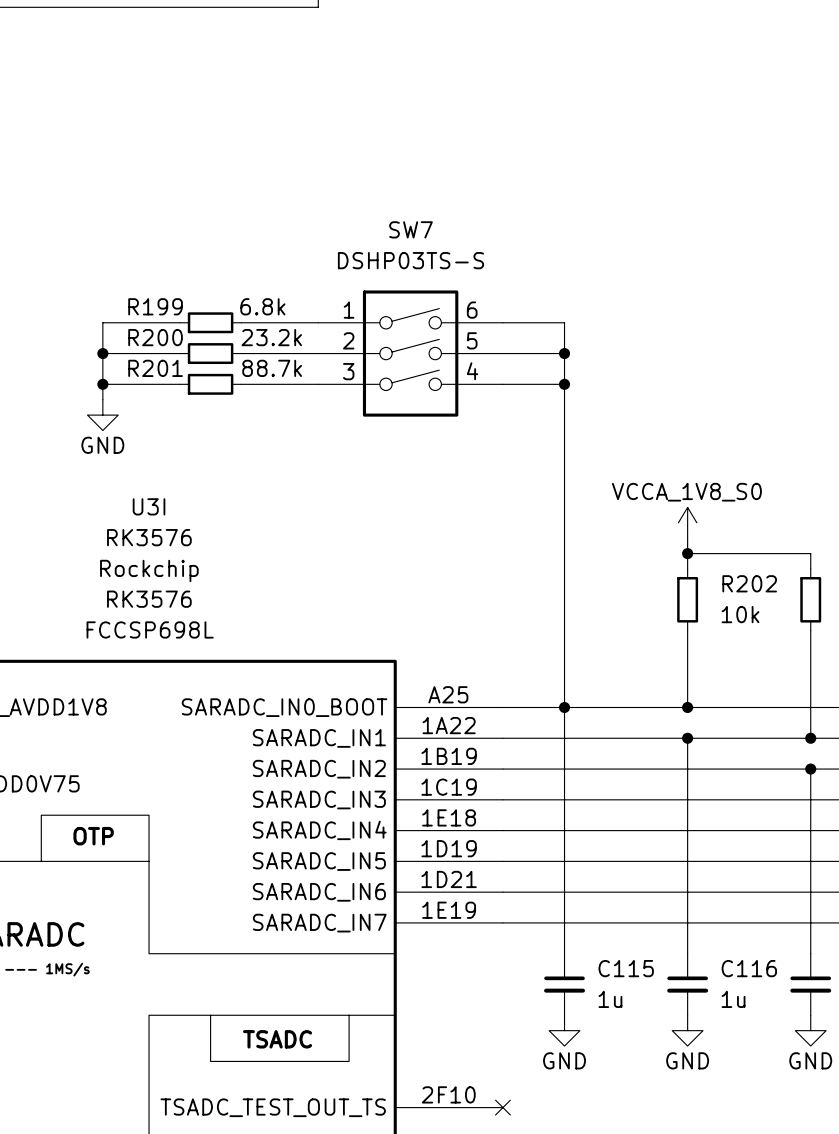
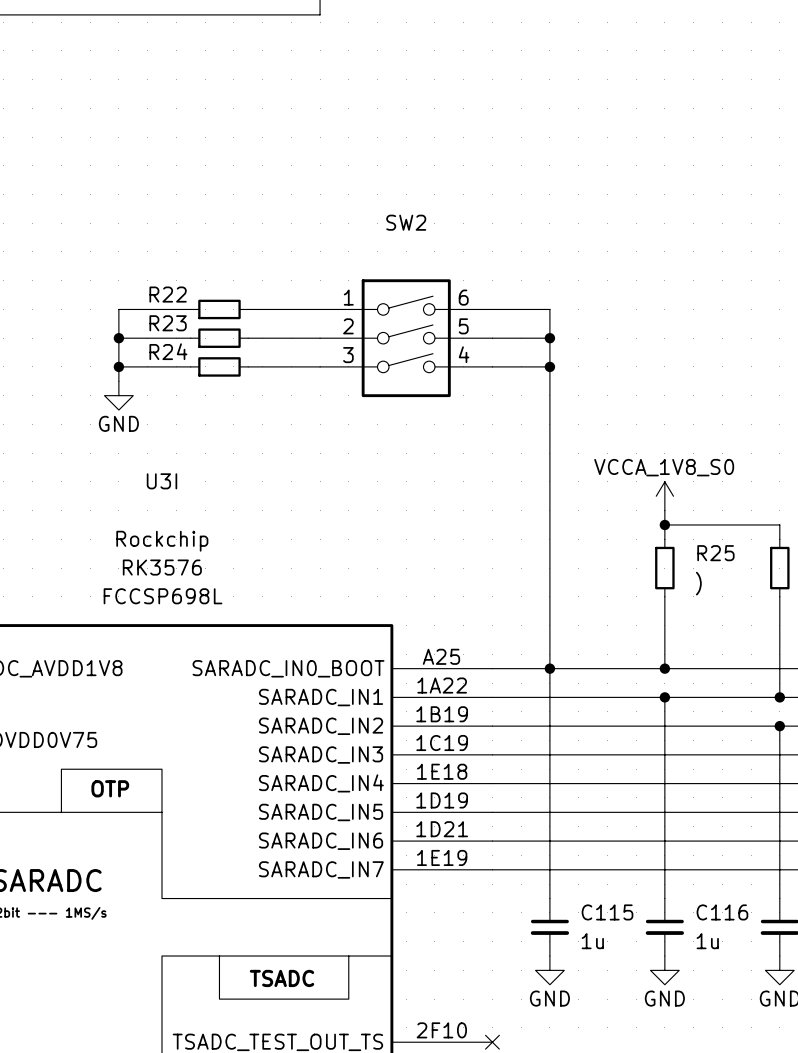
SW7 name: SW7 (411, 229) -> SW2 (406, 222)
SW7 value: DSHP03TS-S (411, 260) -> none
R199 name: R199 (155, 306) -> R22 (168, 294)
R199 value: 6.8k (262, 306) -> none
R200 name: R200 (155, 337) -> R23 (168, 323)
R200 value: 23.2k (271, 337) -> none
R201 name: R201 (155, 368) -> R24 (168, 351)
R201 value: 88.7k (272, 368) -> none
U3I value: RK3576 (149, 537) -> none
R202 name: R202 (749, 583) -> R25 (715, 553)
R202 value: 10k (740, 614) -> ) (698, 583)

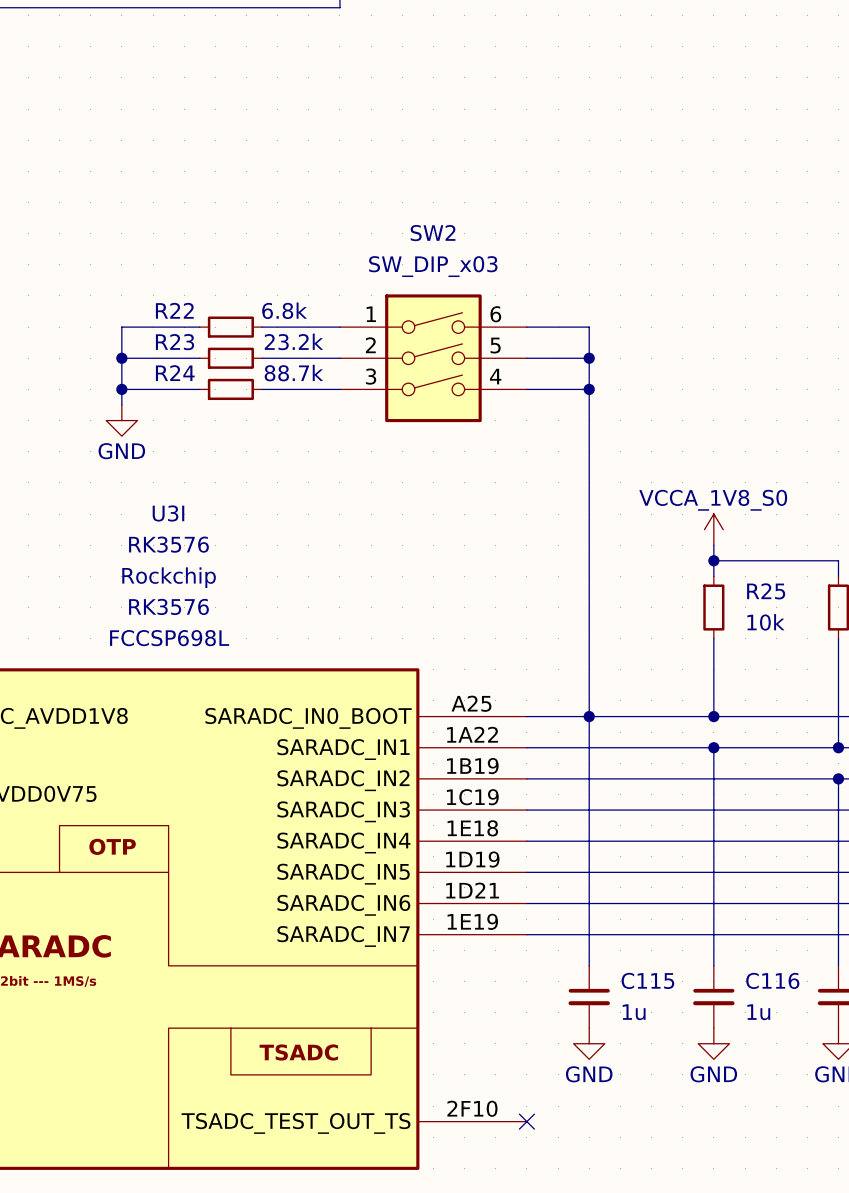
SW2 value: none -> SW_DIP_x03 (433, 266)
R22 value: none -> 6.8k (284, 310)
R23 value: none -> 23.2k (293, 341)
R24 value: none -> 88.7k (293, 373)
U3I value: none -> RK3576 (168, 544)
R25 value: ) (698, 583) -> 10k (765, 622)

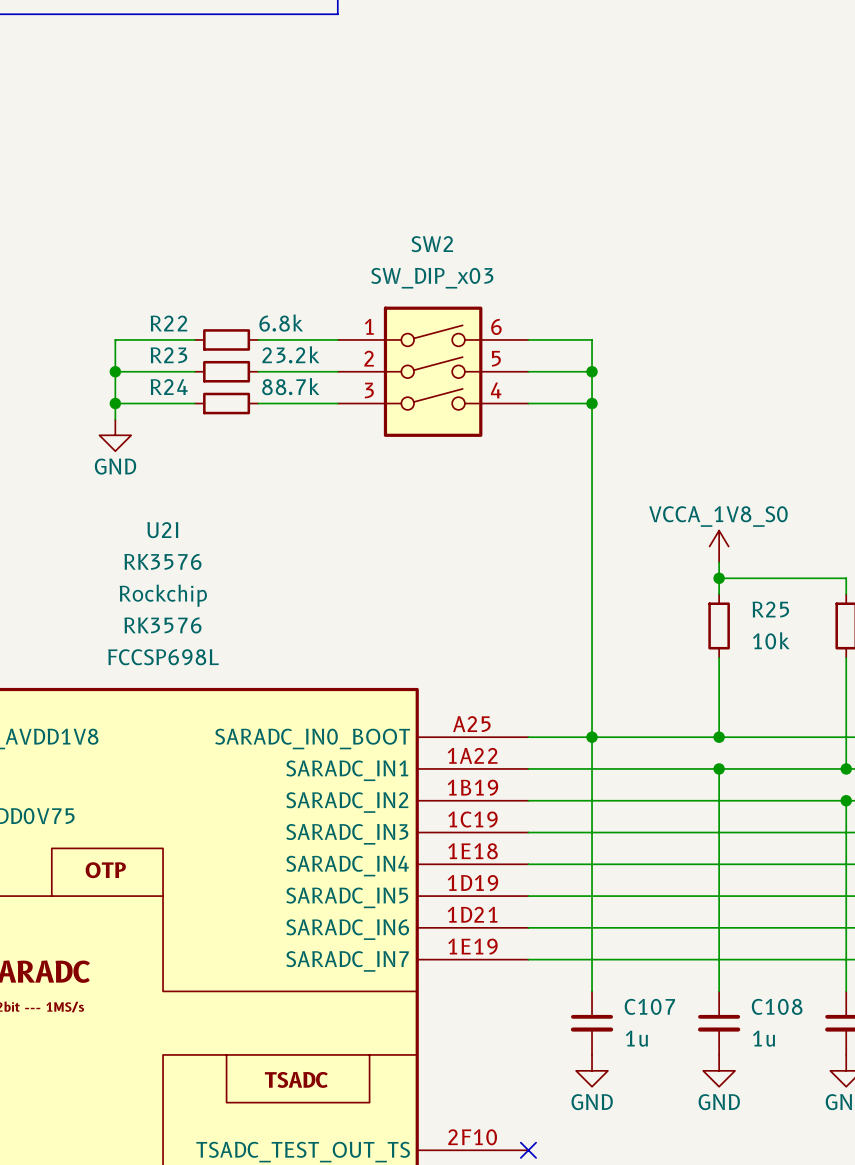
U3I name: U3I (168, 513) -> U2I (162, 530)
C115 name: C115 (647, 980) -> C107 (649, 1006)
C116 name: C116 (772, 980) -> C108 (777, 1006)

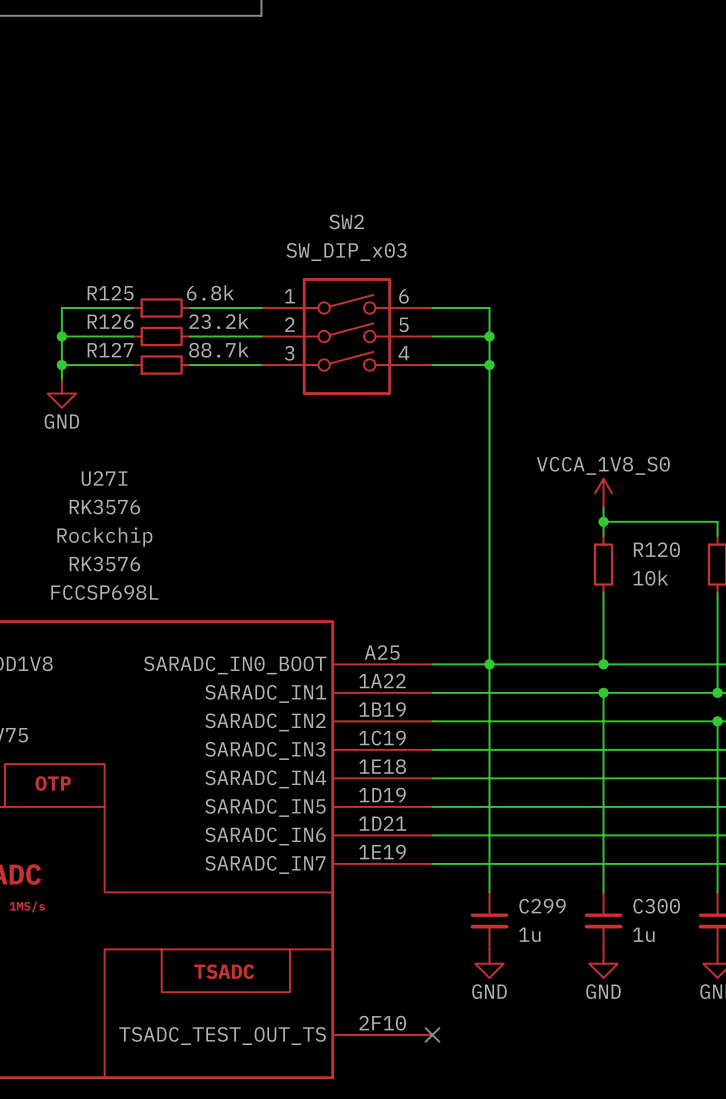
R22 name: R22 (168, 323) -> R125 (110, 293)
R23 name: R23 (168, 355) -> R126 (110, 321)
R24 name: R24 (169, 387) -> R127 (110, 350)
U2I name: U2I (162, 530) -> U27I (104, 478)
R25 name: R25 (770, 609) -> R120 (656, 549)
C107 name: C107 (649, 1006) -> C299 (542, 906)
C108 name: C108 (777, 1006) -> C300 (656, 906)

